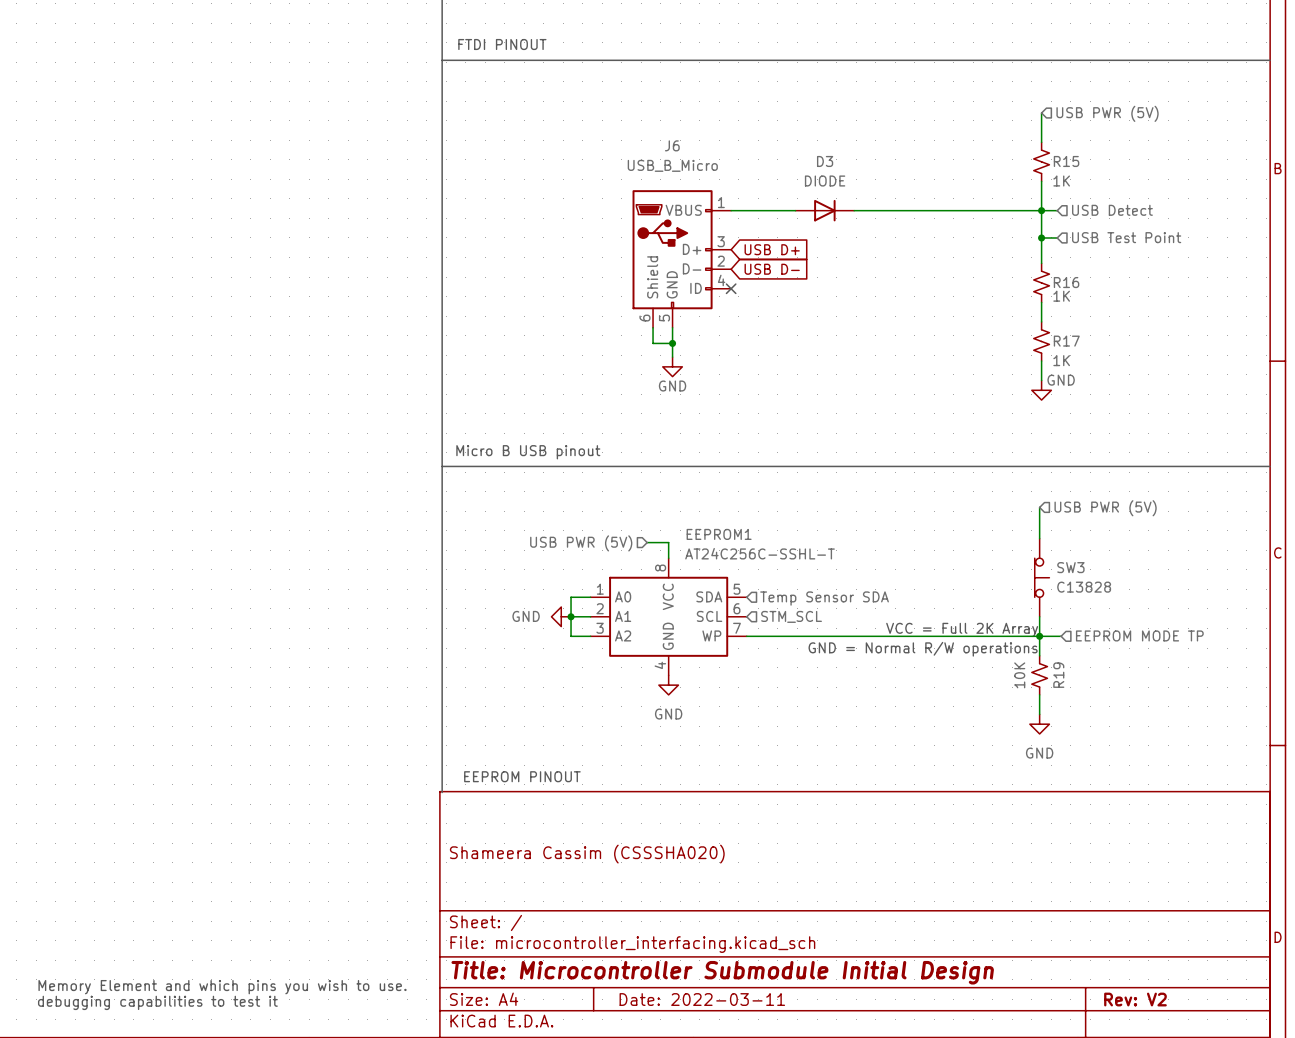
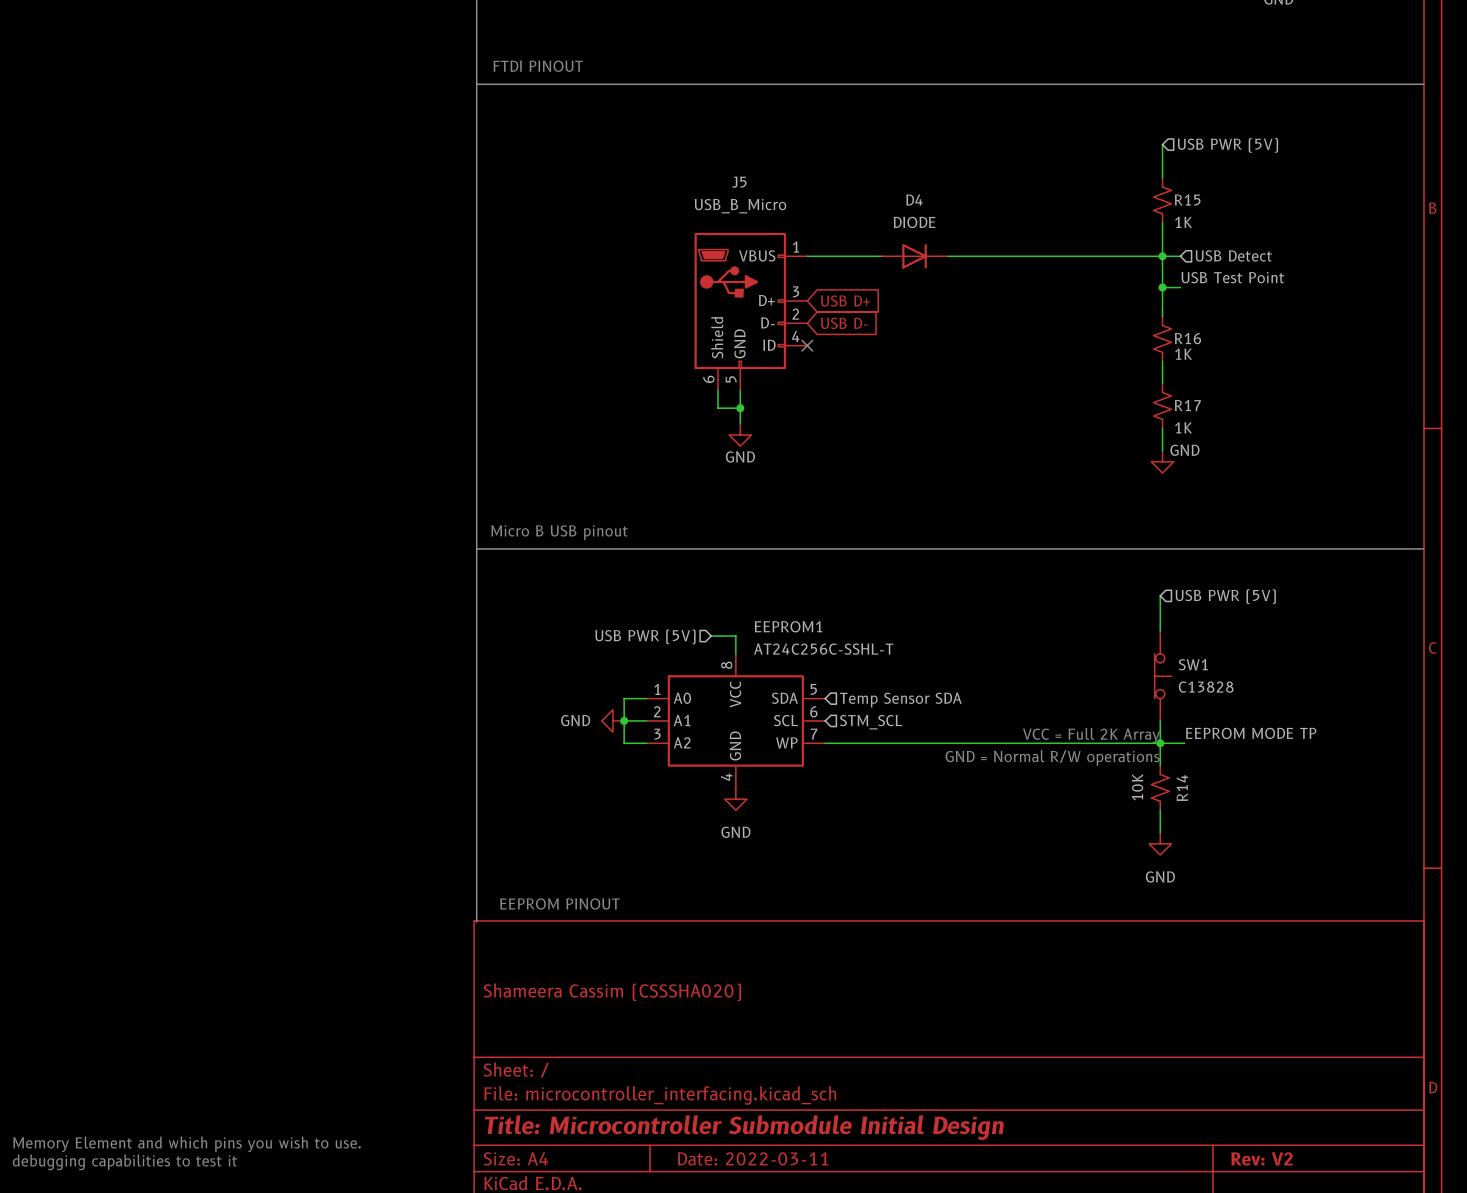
J6 name: J6 (672, 145) -> J5 (739, 182)
D3 name: D3 (825, 161) -> D4 (914, 200)
label: none -> USB Test Point (1232, 277)
hierarchical label: USB Test Point (1126, 237) -> none
SW3 name: SW3 (1070, 567) -> SW1 (1193, 664)
label: none -> EEPROM MODE TP (1251, 733)
hierarchical label: EEPROM MODE TP (1139, 635) -> none
R19 name: R19 (1058, 675) -> R14 (1182, 788)

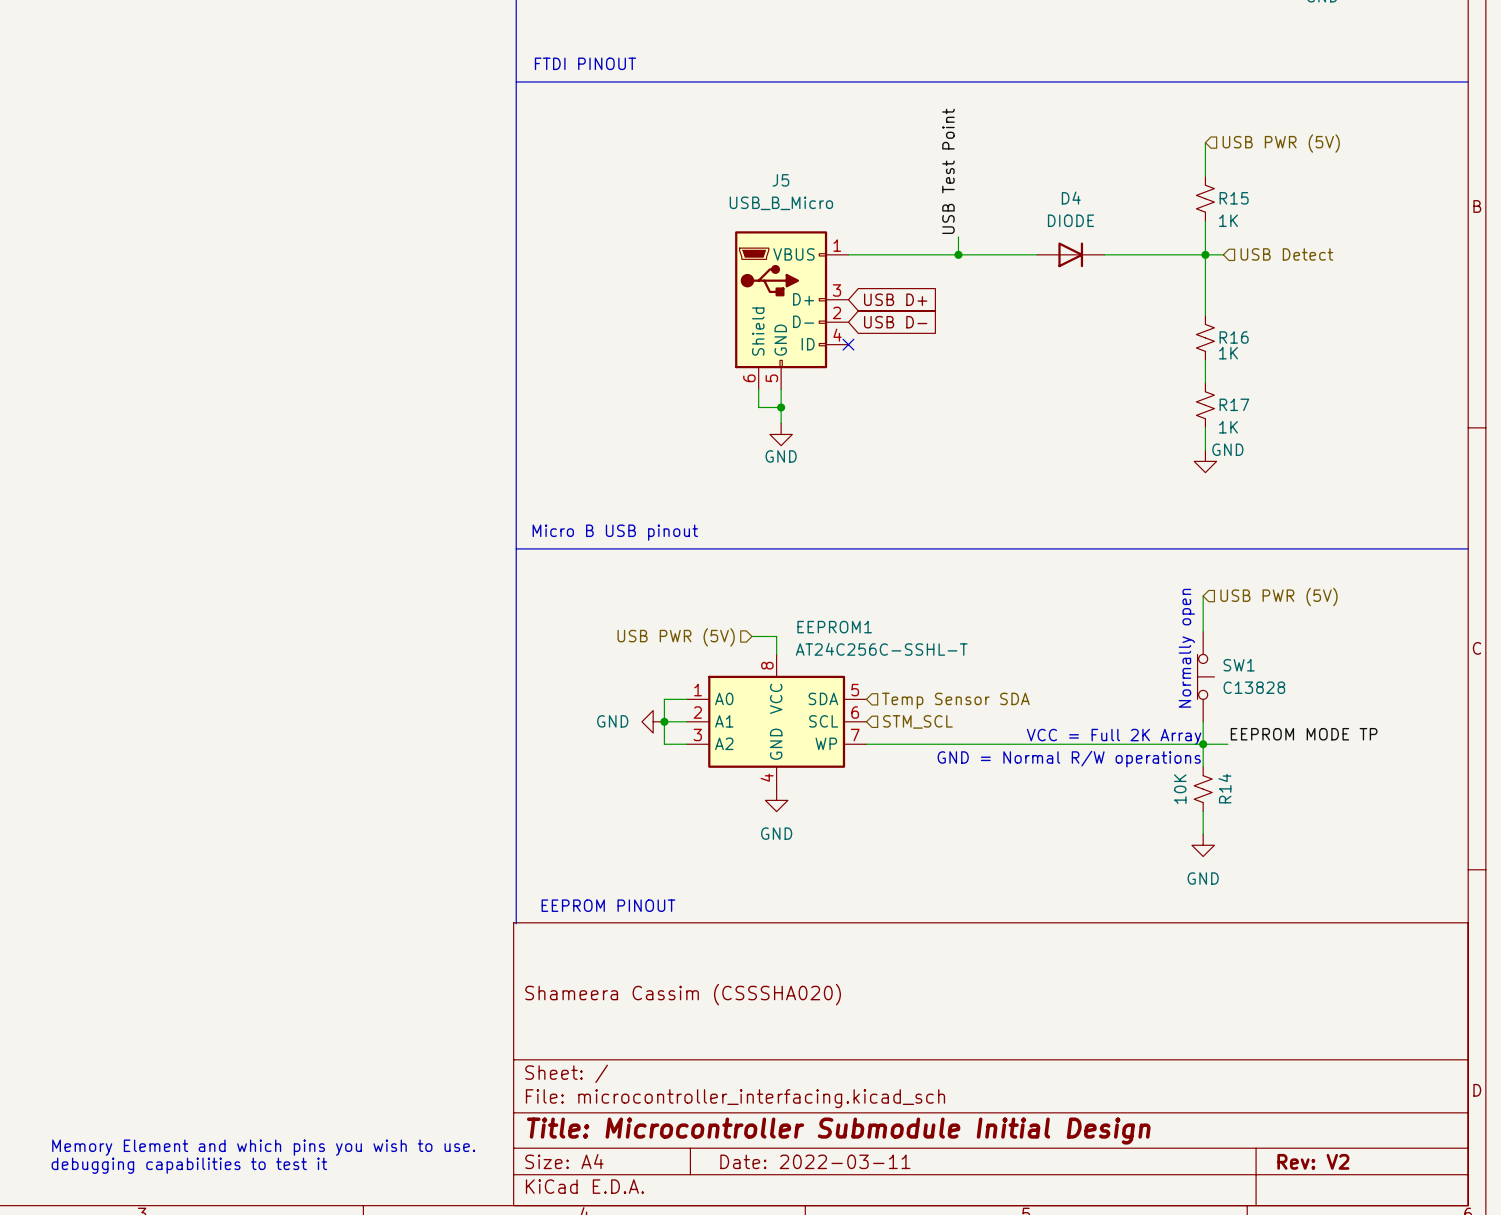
label: none -> USB Test Point (948, 171)
wire: none -> (958, 236) (958, 254)
D4 position: (914, 256) -> (1070, 254)
junction: none -> (958, 254)
label: USB Test Point (1232, 277) -> none
wire: (1162, 287) (1180, 287) -> none
junction: (1162, 287) -> none
text: none -> Normally open (1186, 648)

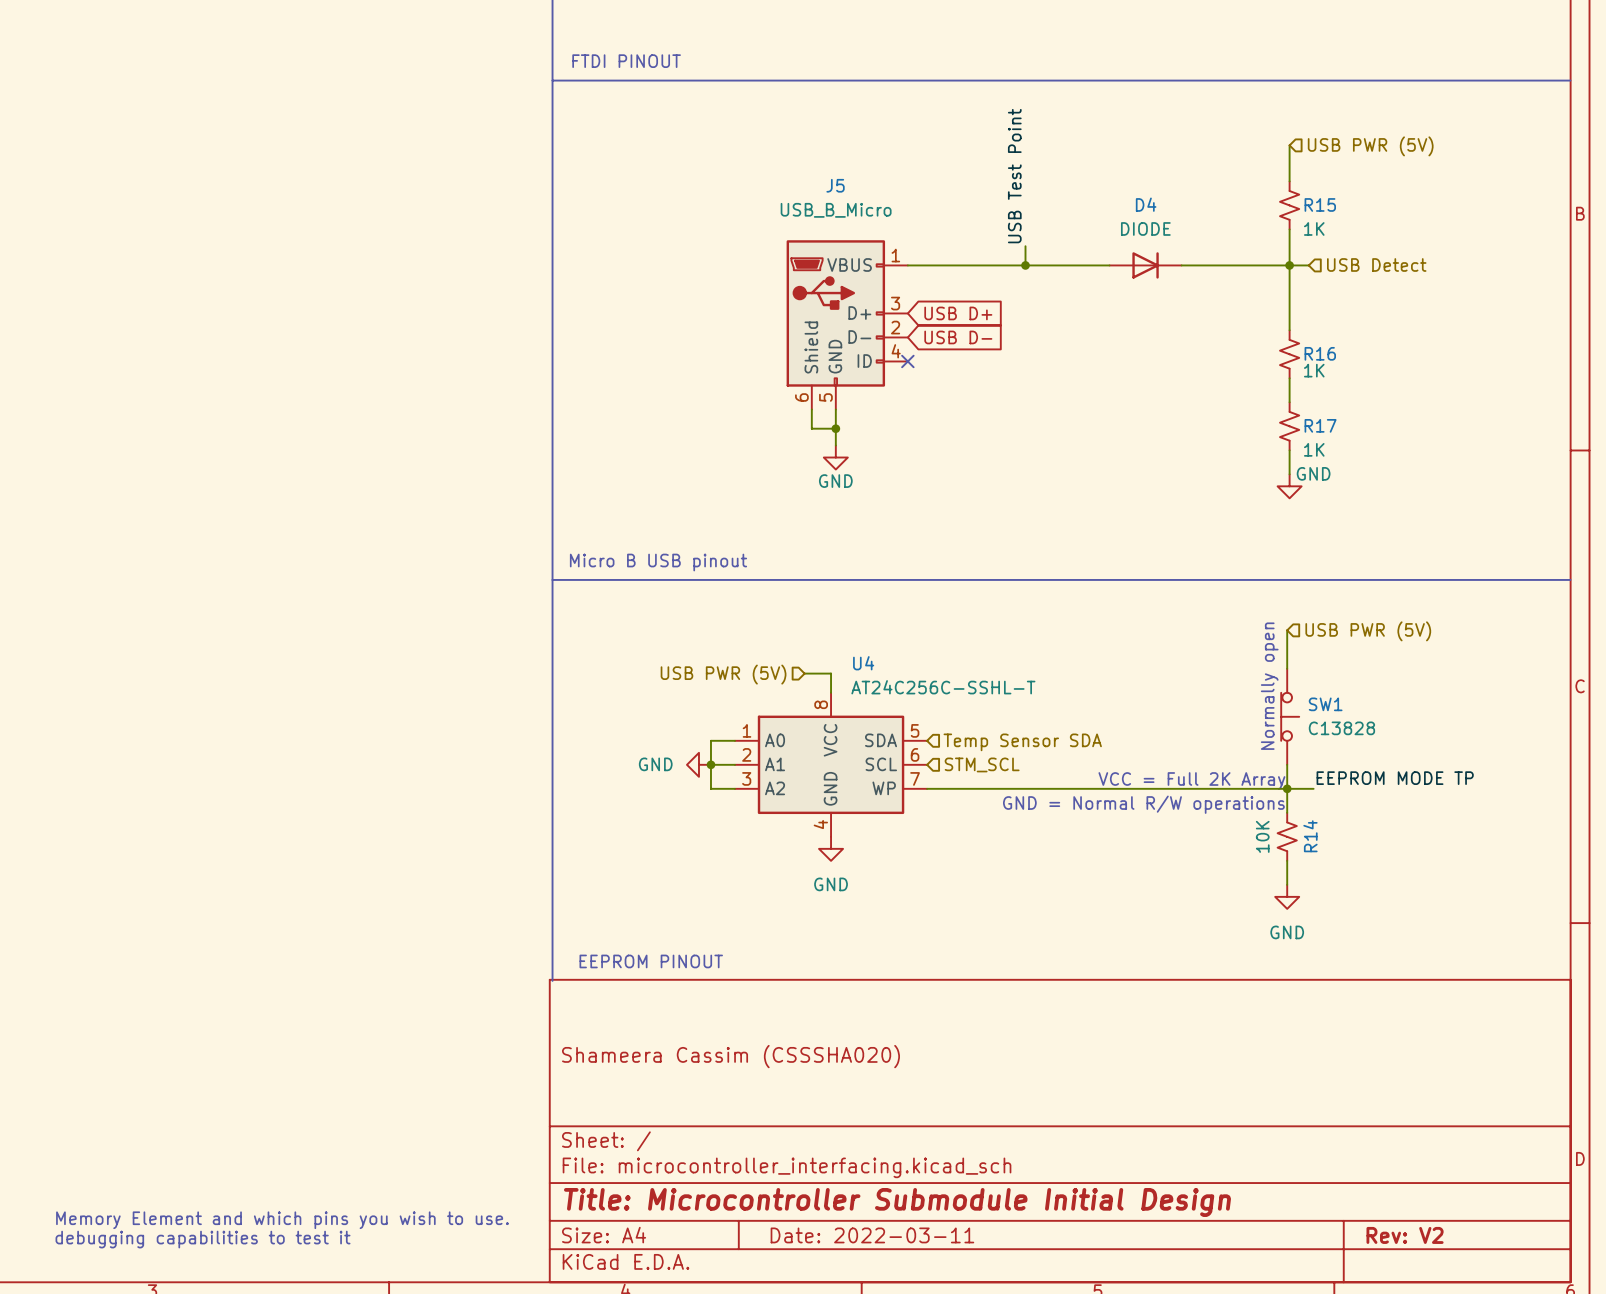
EEPROM1 name: EEPROM1 (834, 627) -> U4 (863, 663)

